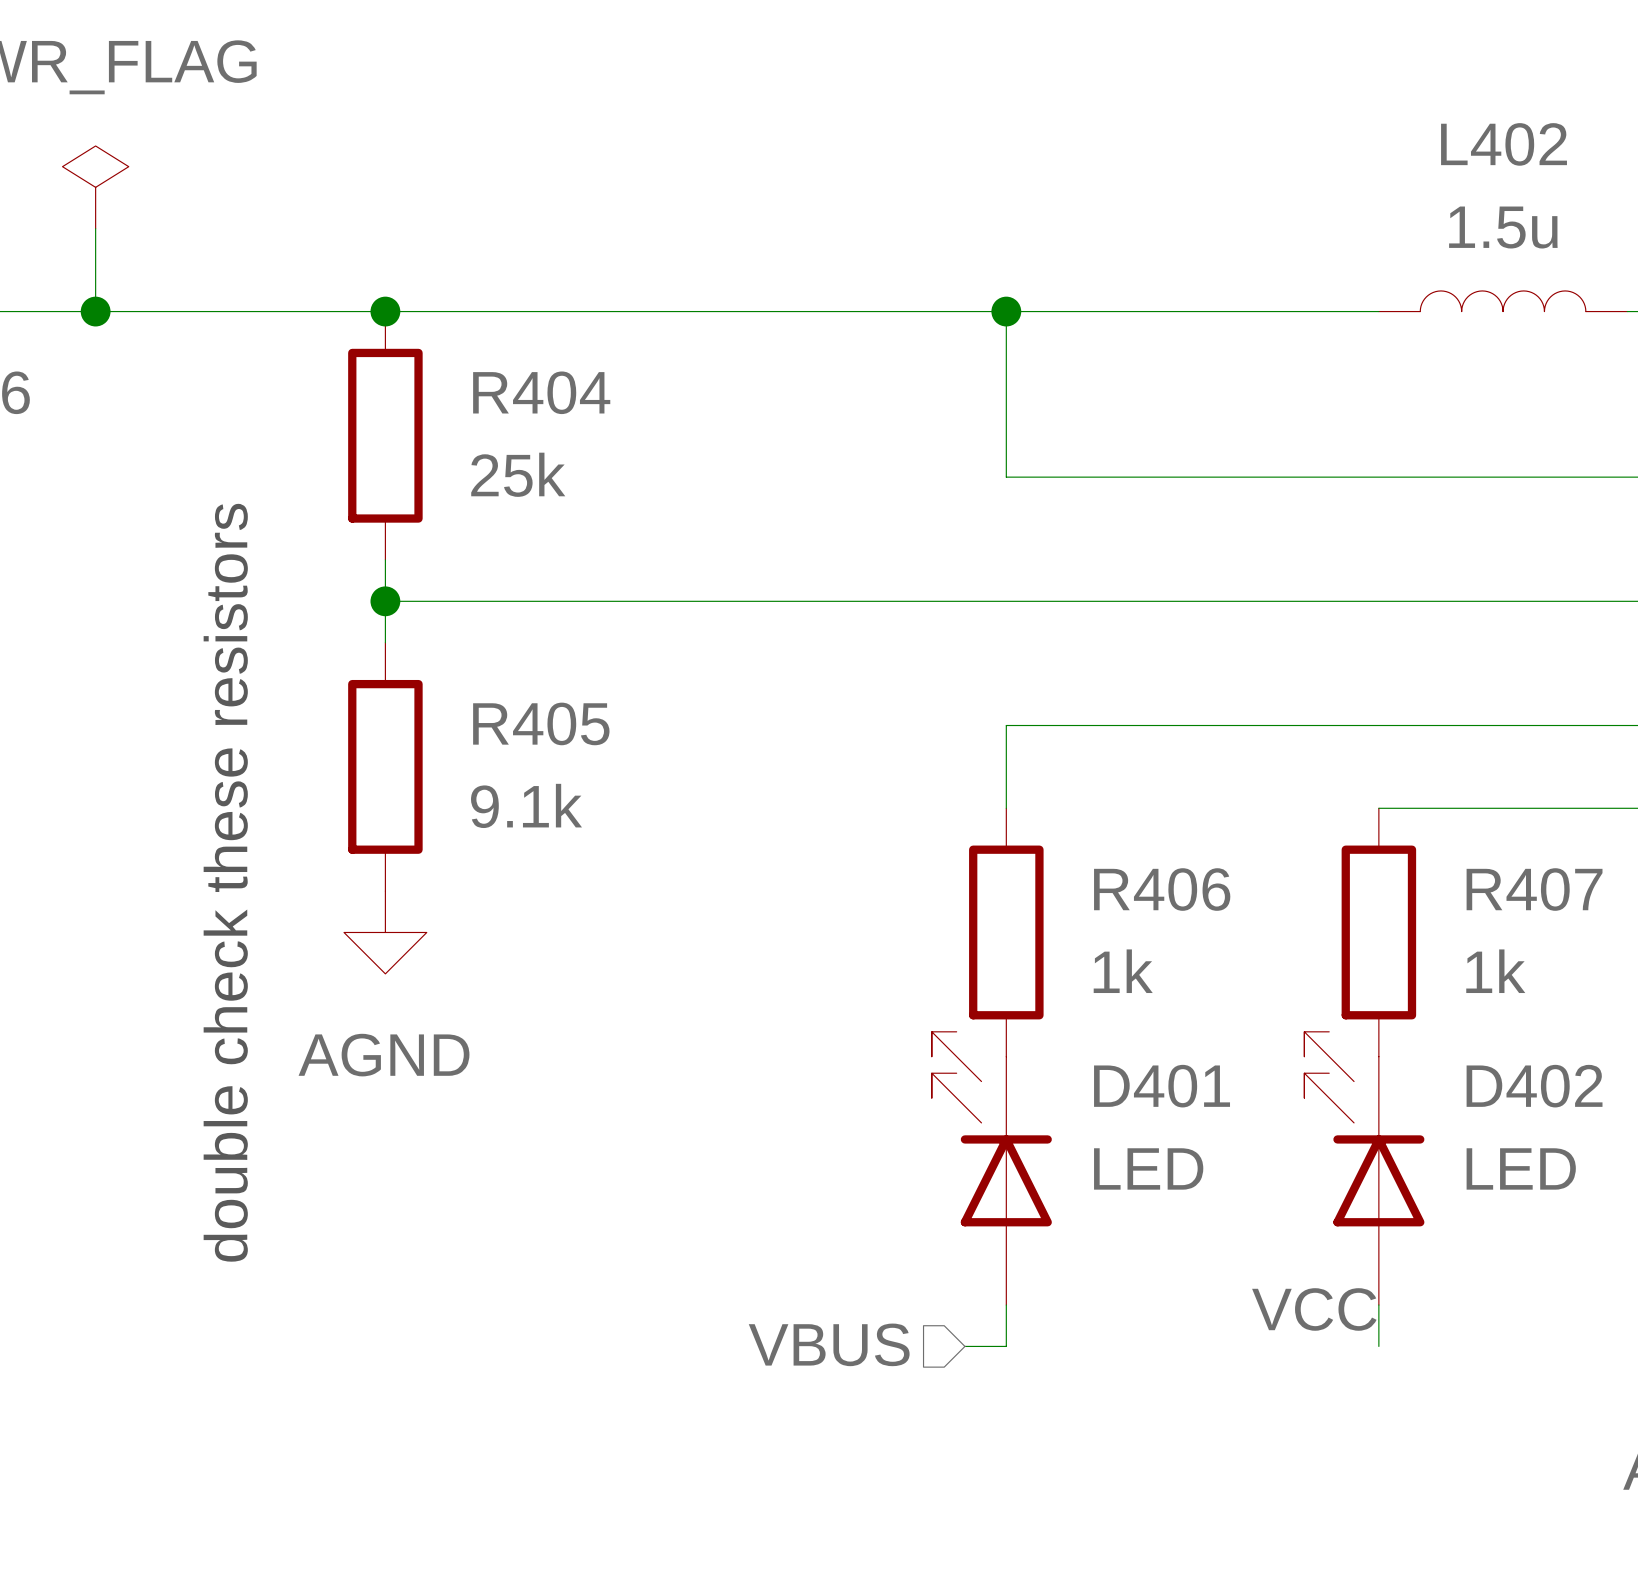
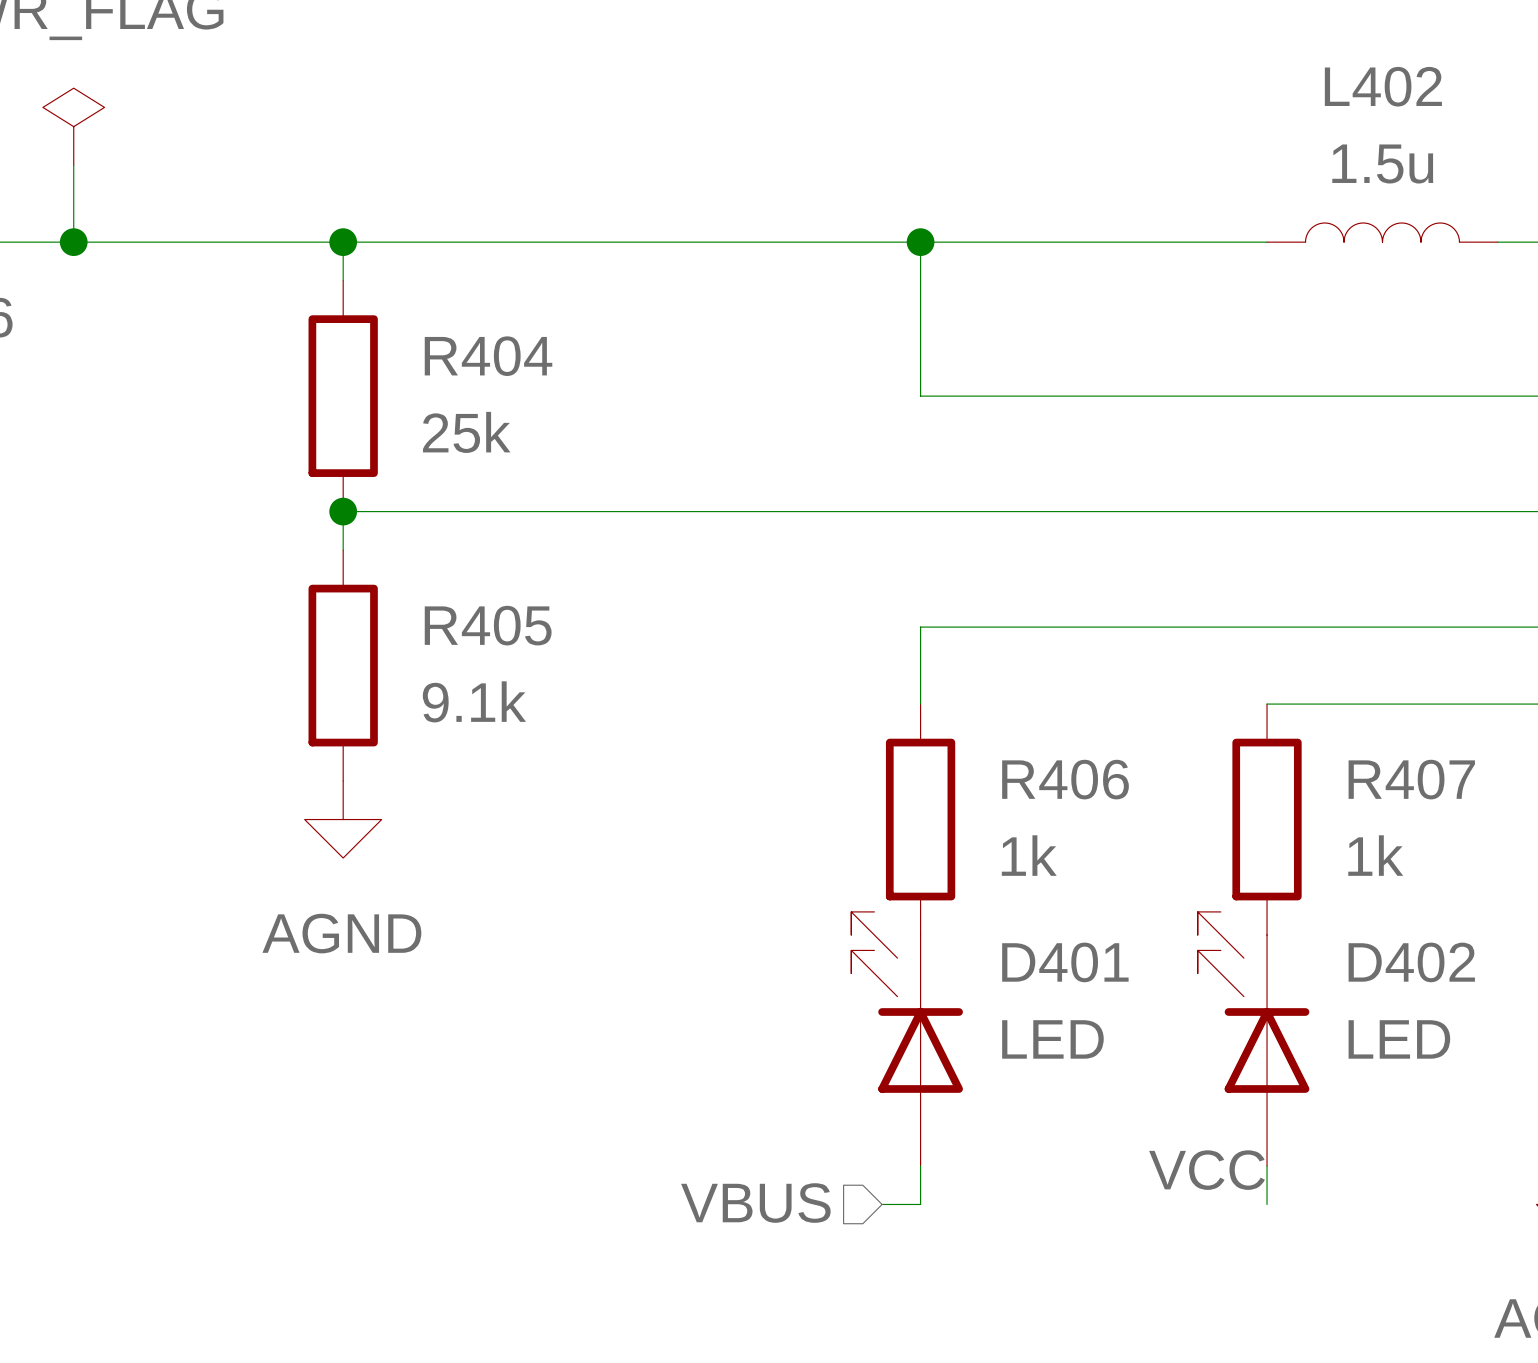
R404 position: (385, 435) -> (343, 396)
text: double check these resistors (225, 882) -> none

